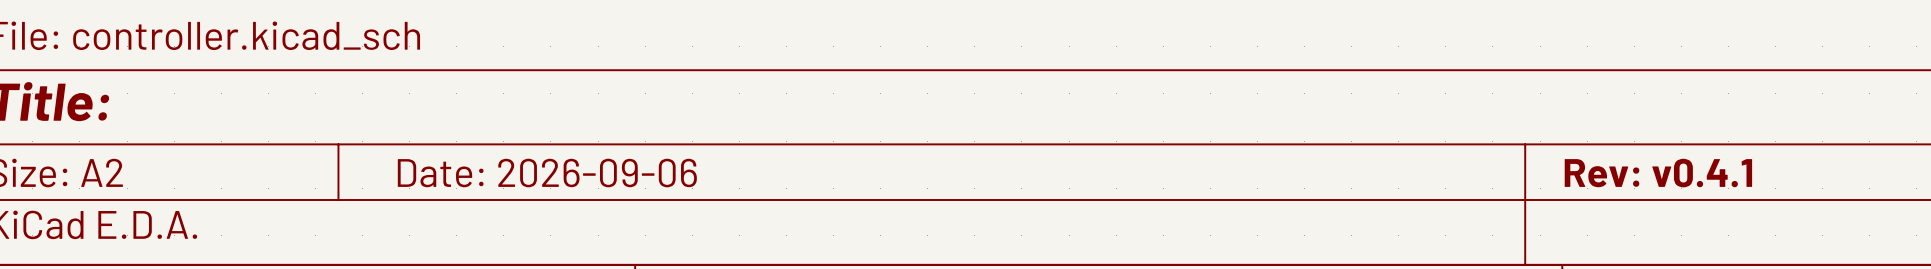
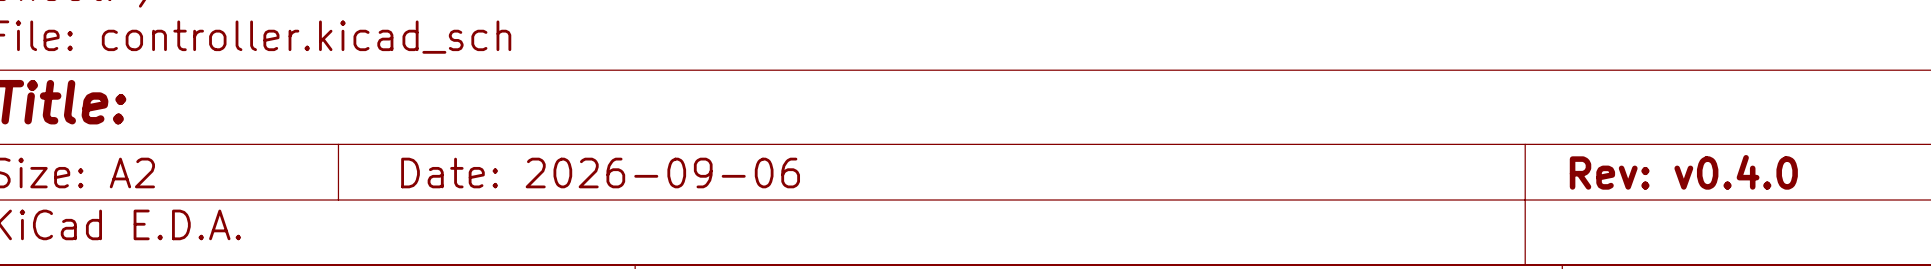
title block: Rev: v0.4.1 (1658, 173) -> Rev: v0.4.0 (1683, 172)

